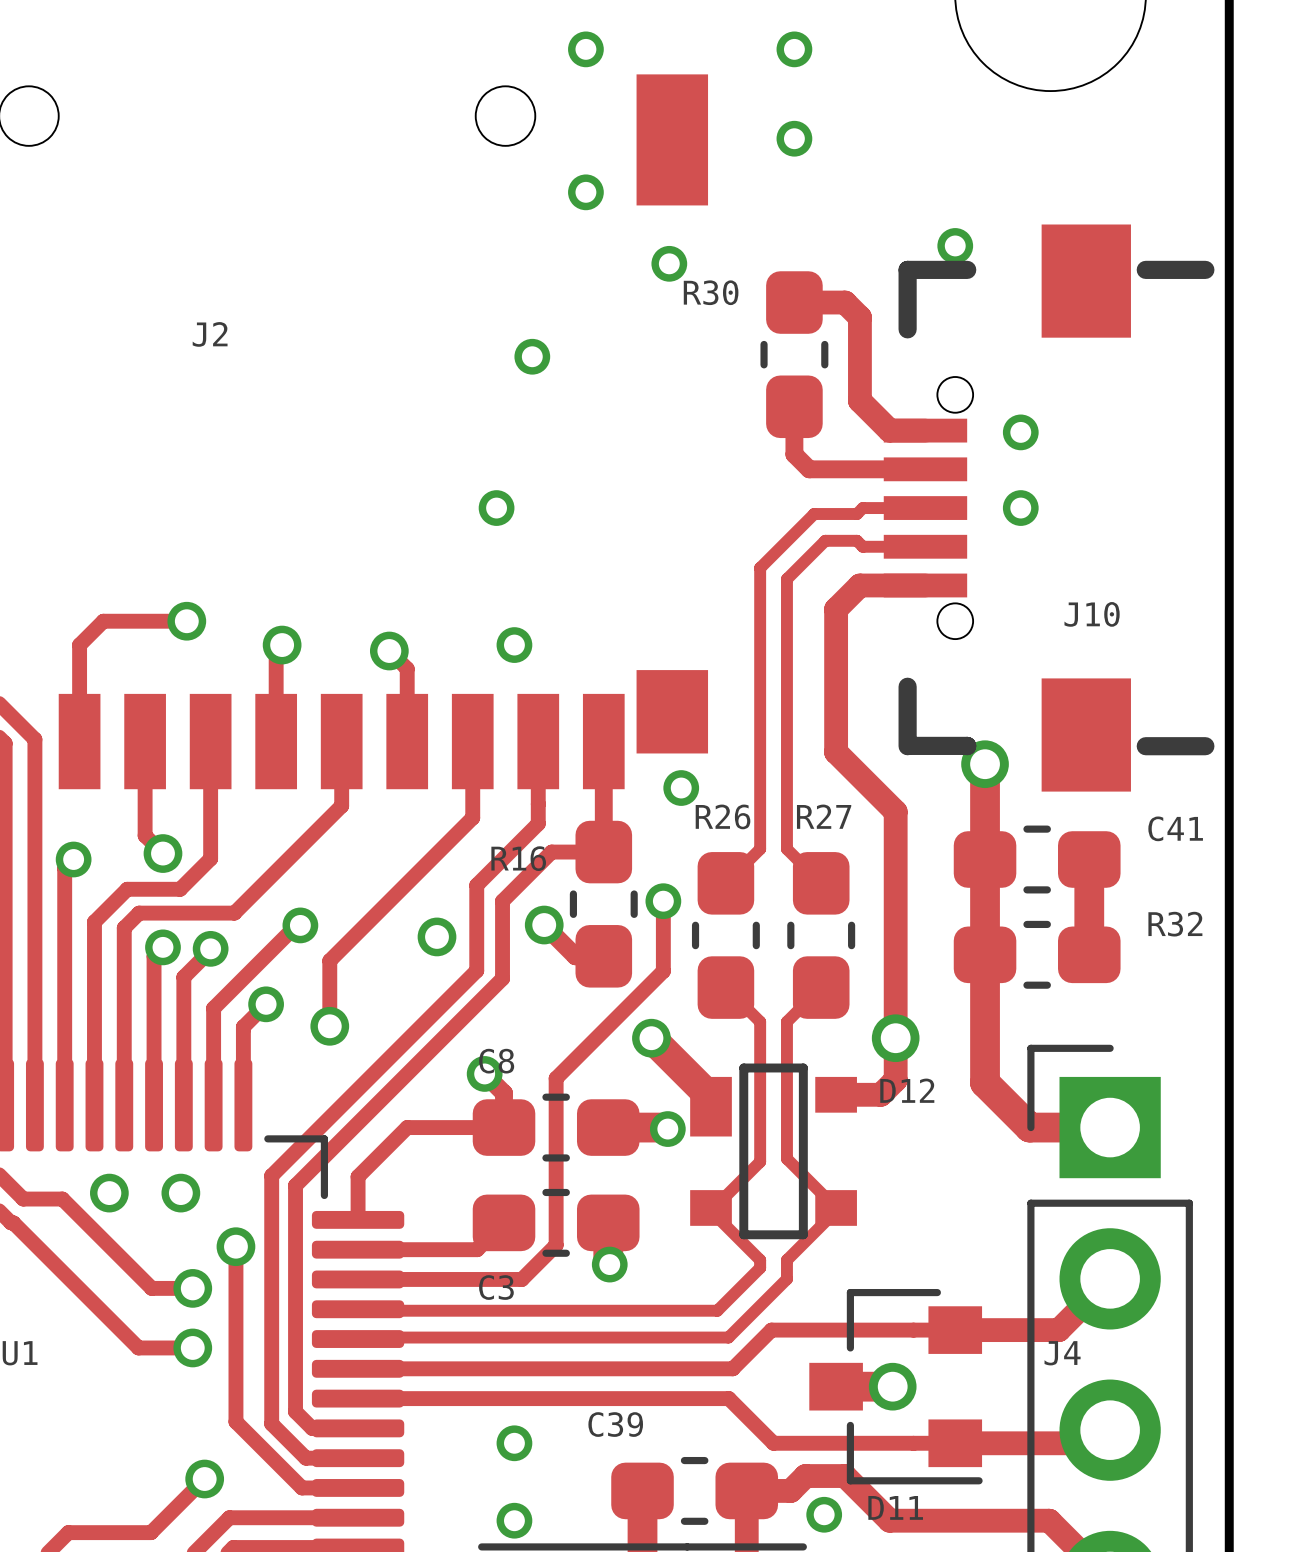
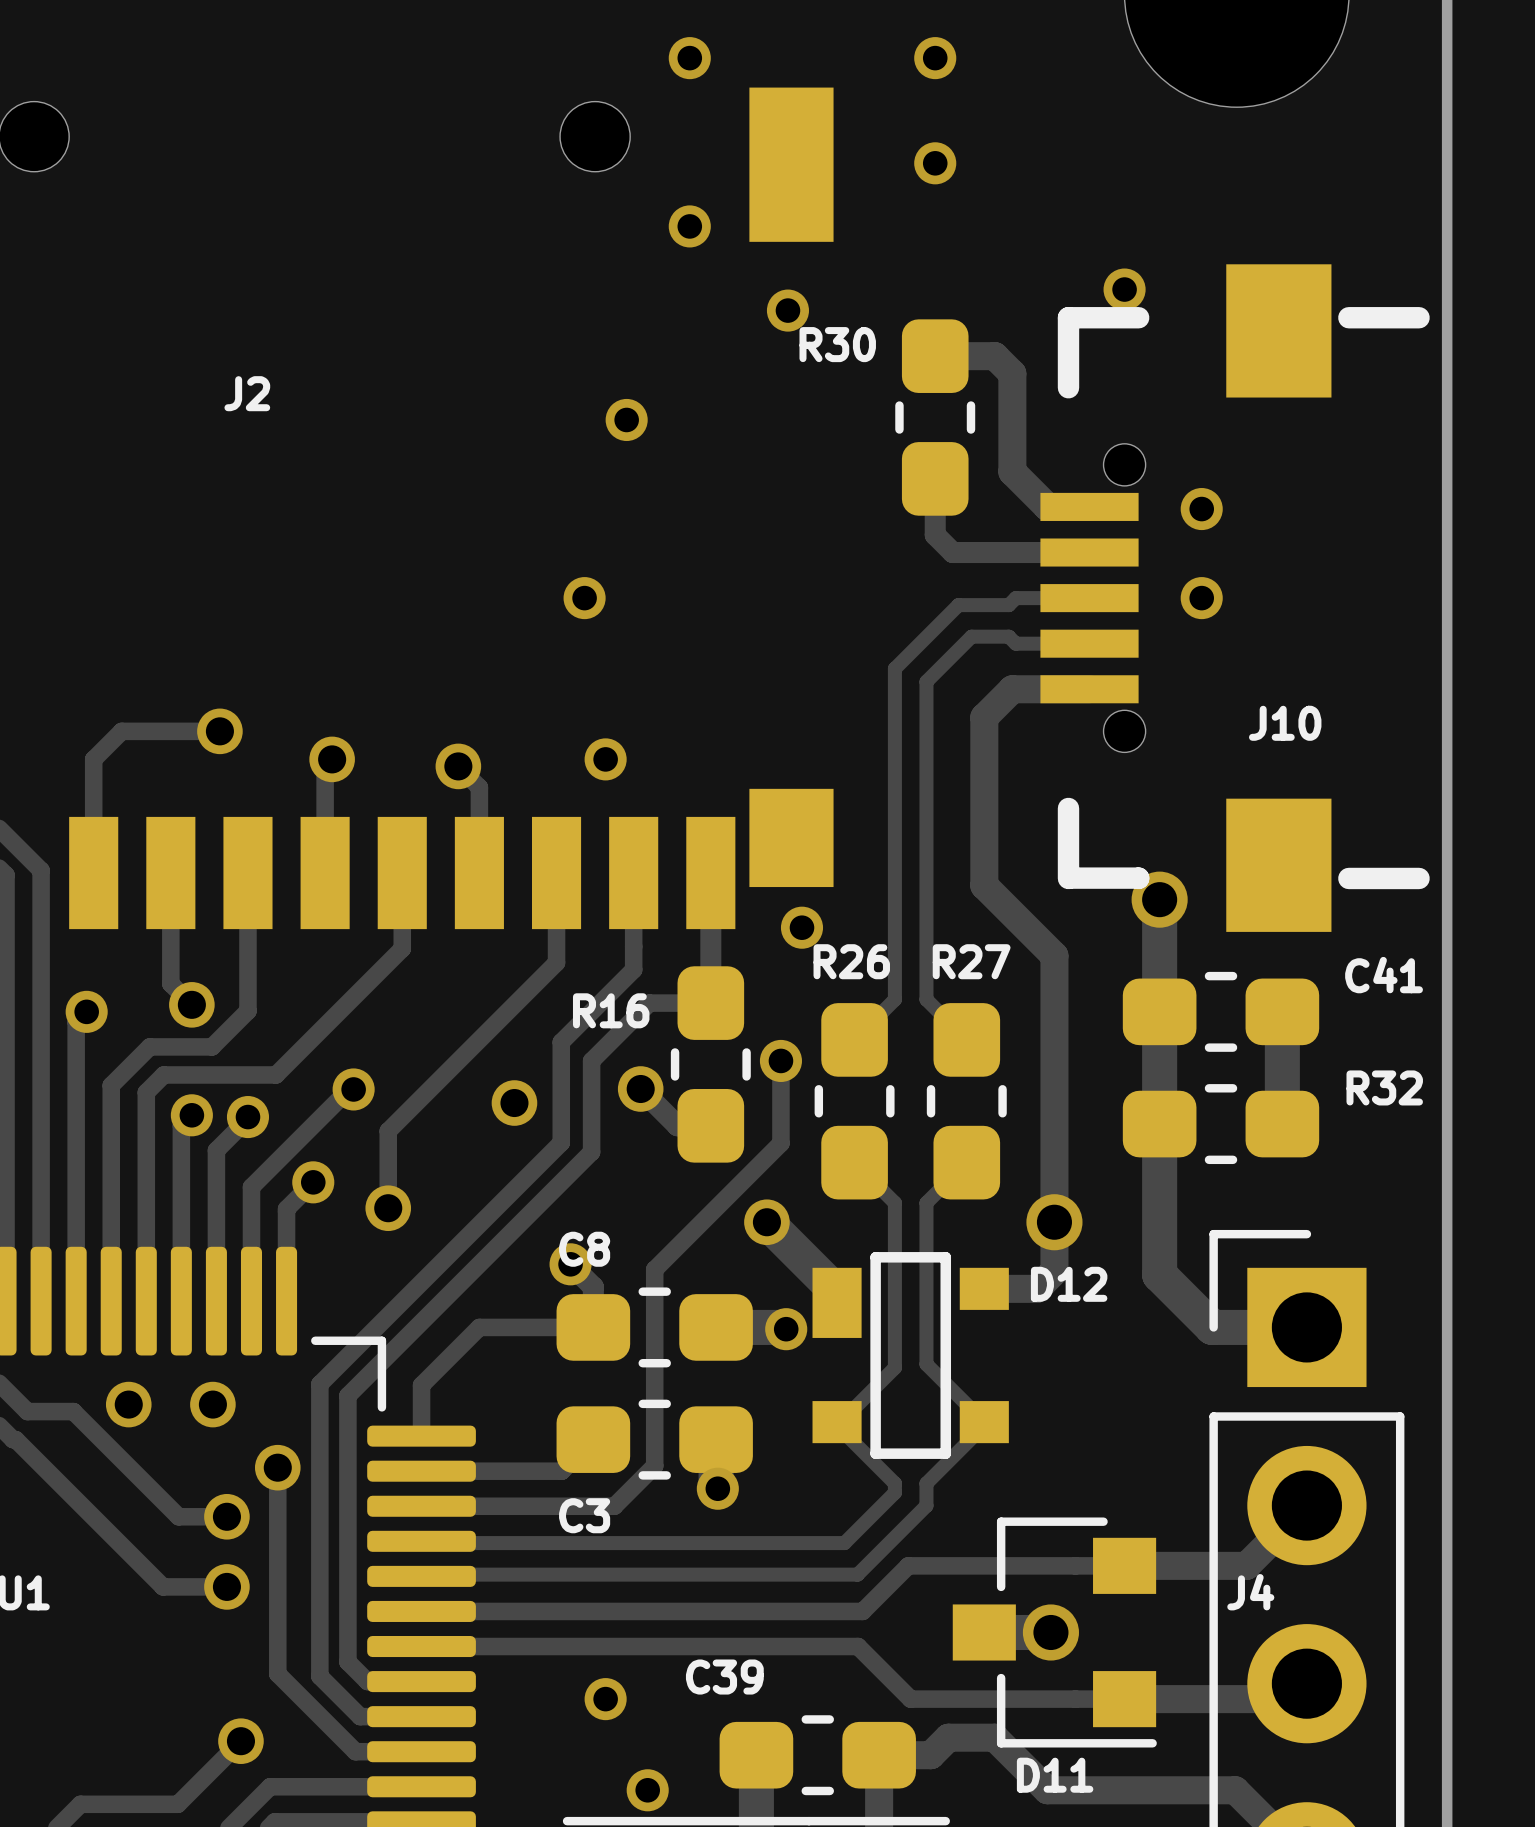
via: (824, 1514) -> none
via position: (514, 1520) -> (647, 1790)

